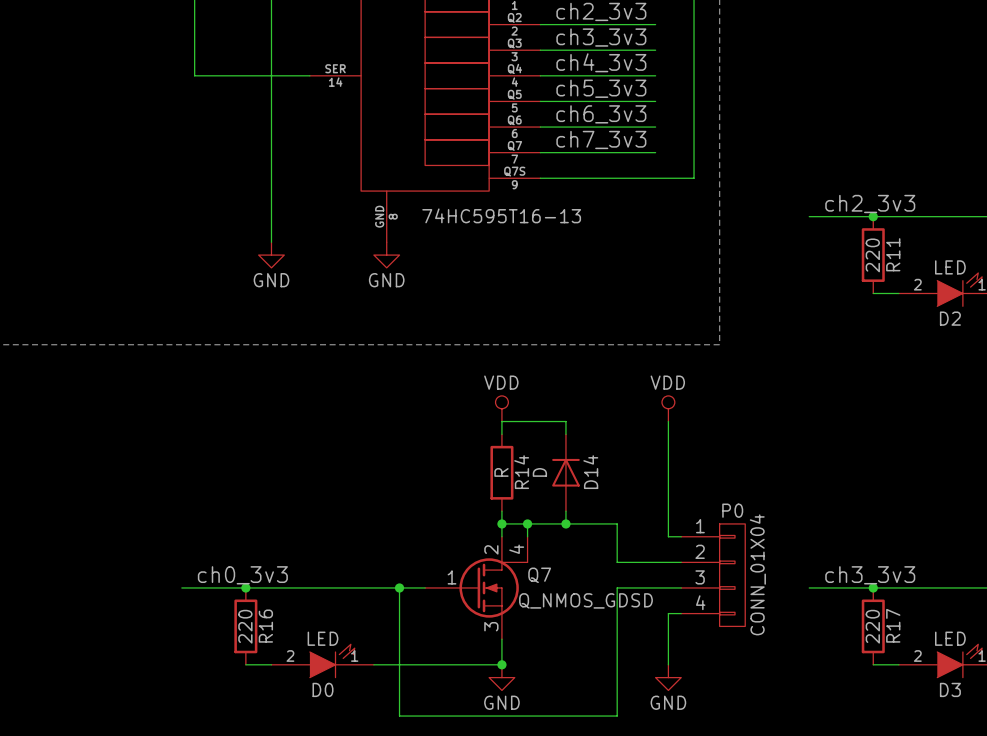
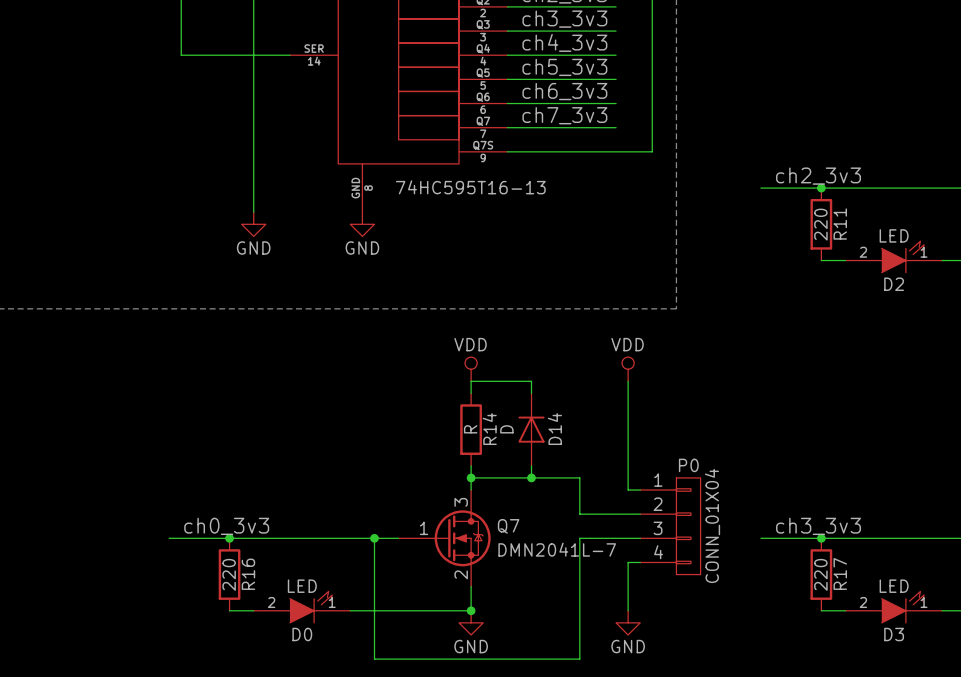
wire: (527, 523) (527, 536) -> none
junction: (527, 523) -> none
Q7 symbol: [425, 536, 528, 640] -> [398, 490, 491, 587]
Q7 value: Q_NMOS_GDSD (585, 600) -> DMN2041L-7 (557, 549)

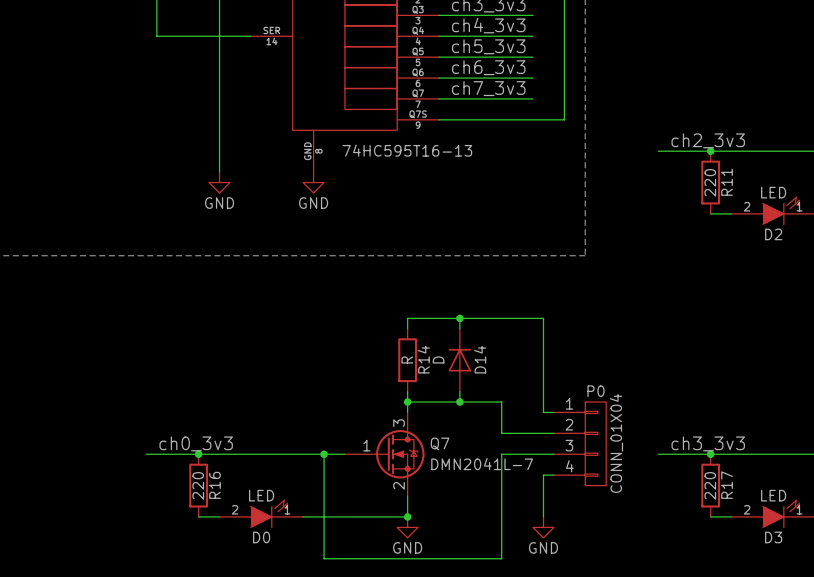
power symbol: VDD (471, 369) -> none
power symbol: VDD (628, 369) -> none
wire: none -> (459, 318) (543, 318)
junction: none -> (459, 318)

